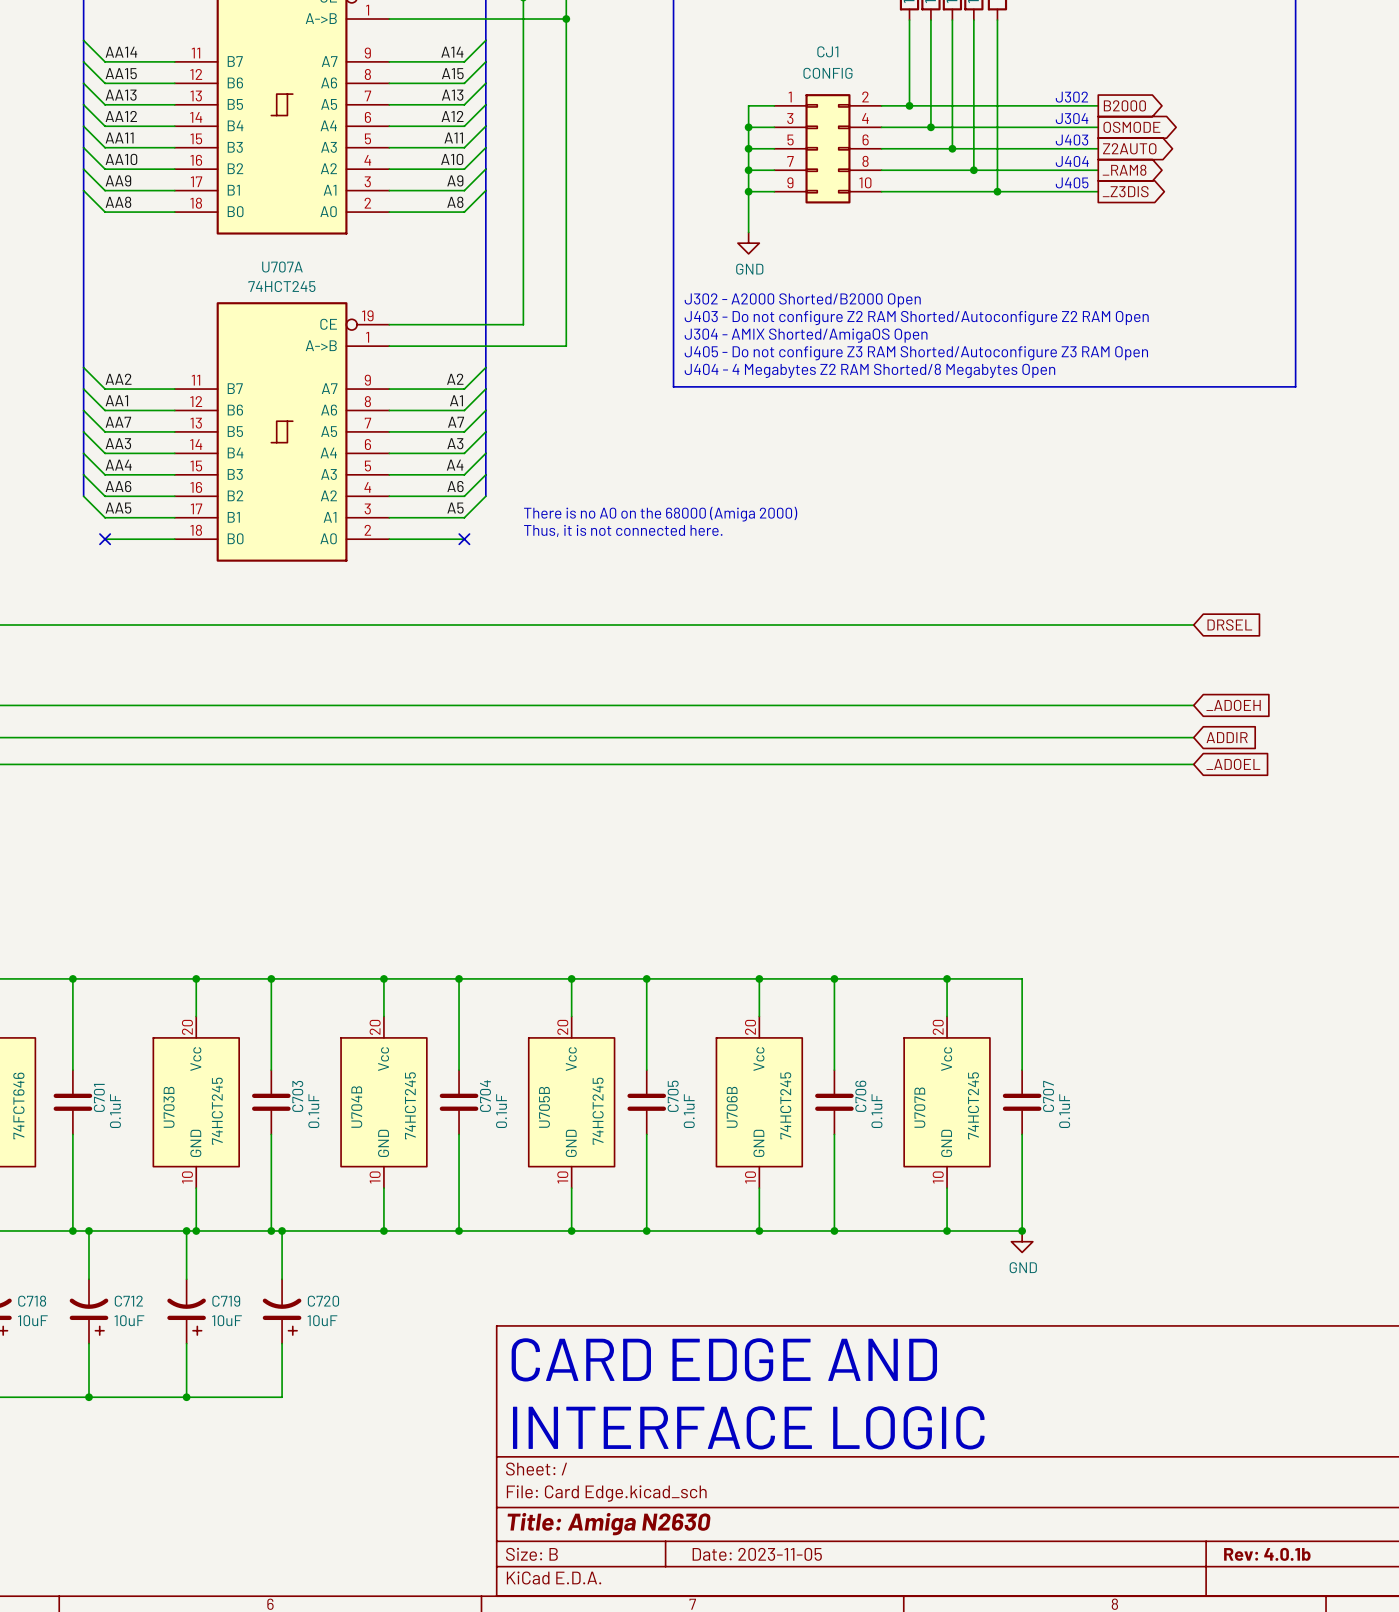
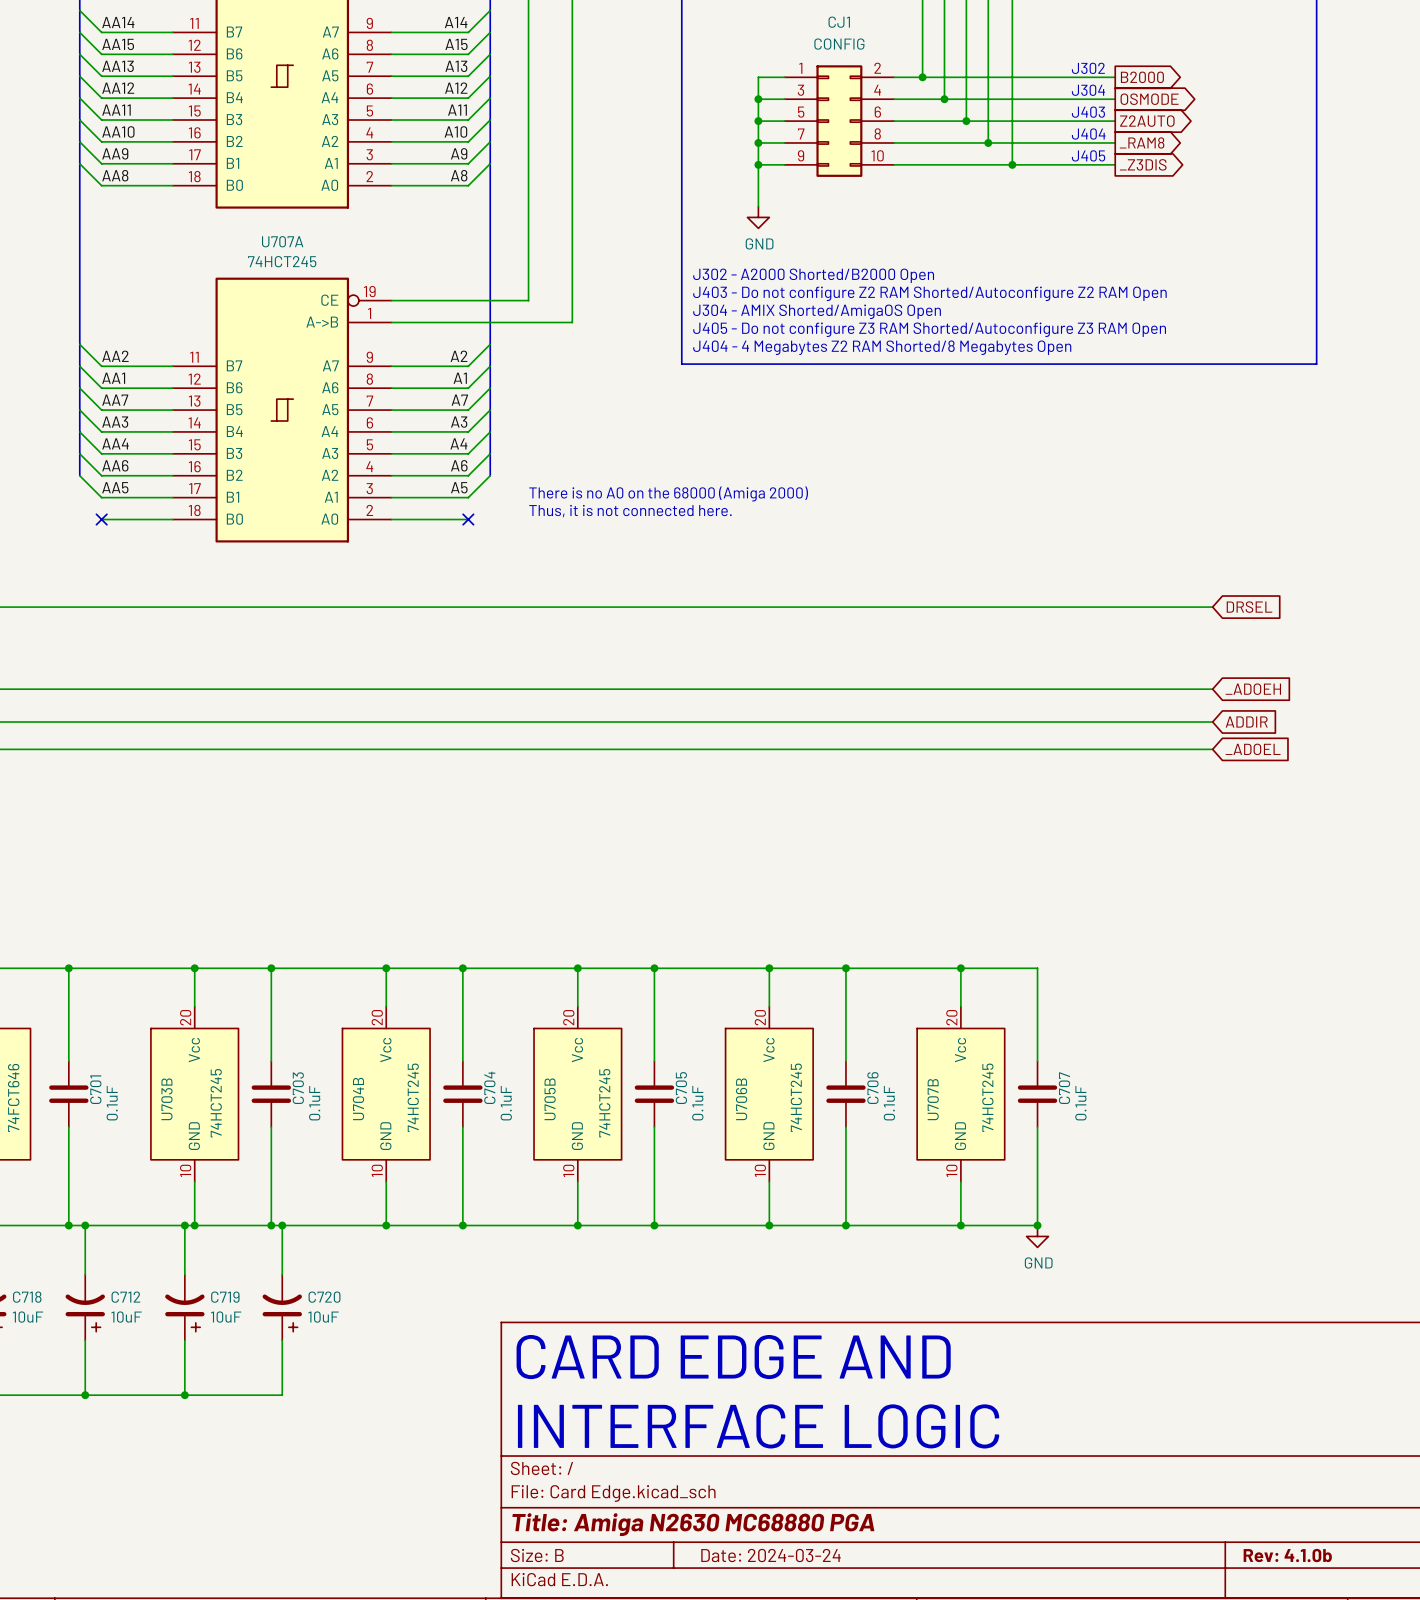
title block: Title: Amiga N2630 (609, 1524) -> Title: Amiga N2630 MC68880 PGA (693, 1524)
title block: Date: 2023-11-05 (757, 1554) -> Date: 2024-03-24 (771, 1555)
title block: Rev: 4.0.1b (1267, 1554) -> Rev: 4.1.0b (1287, 1555)

